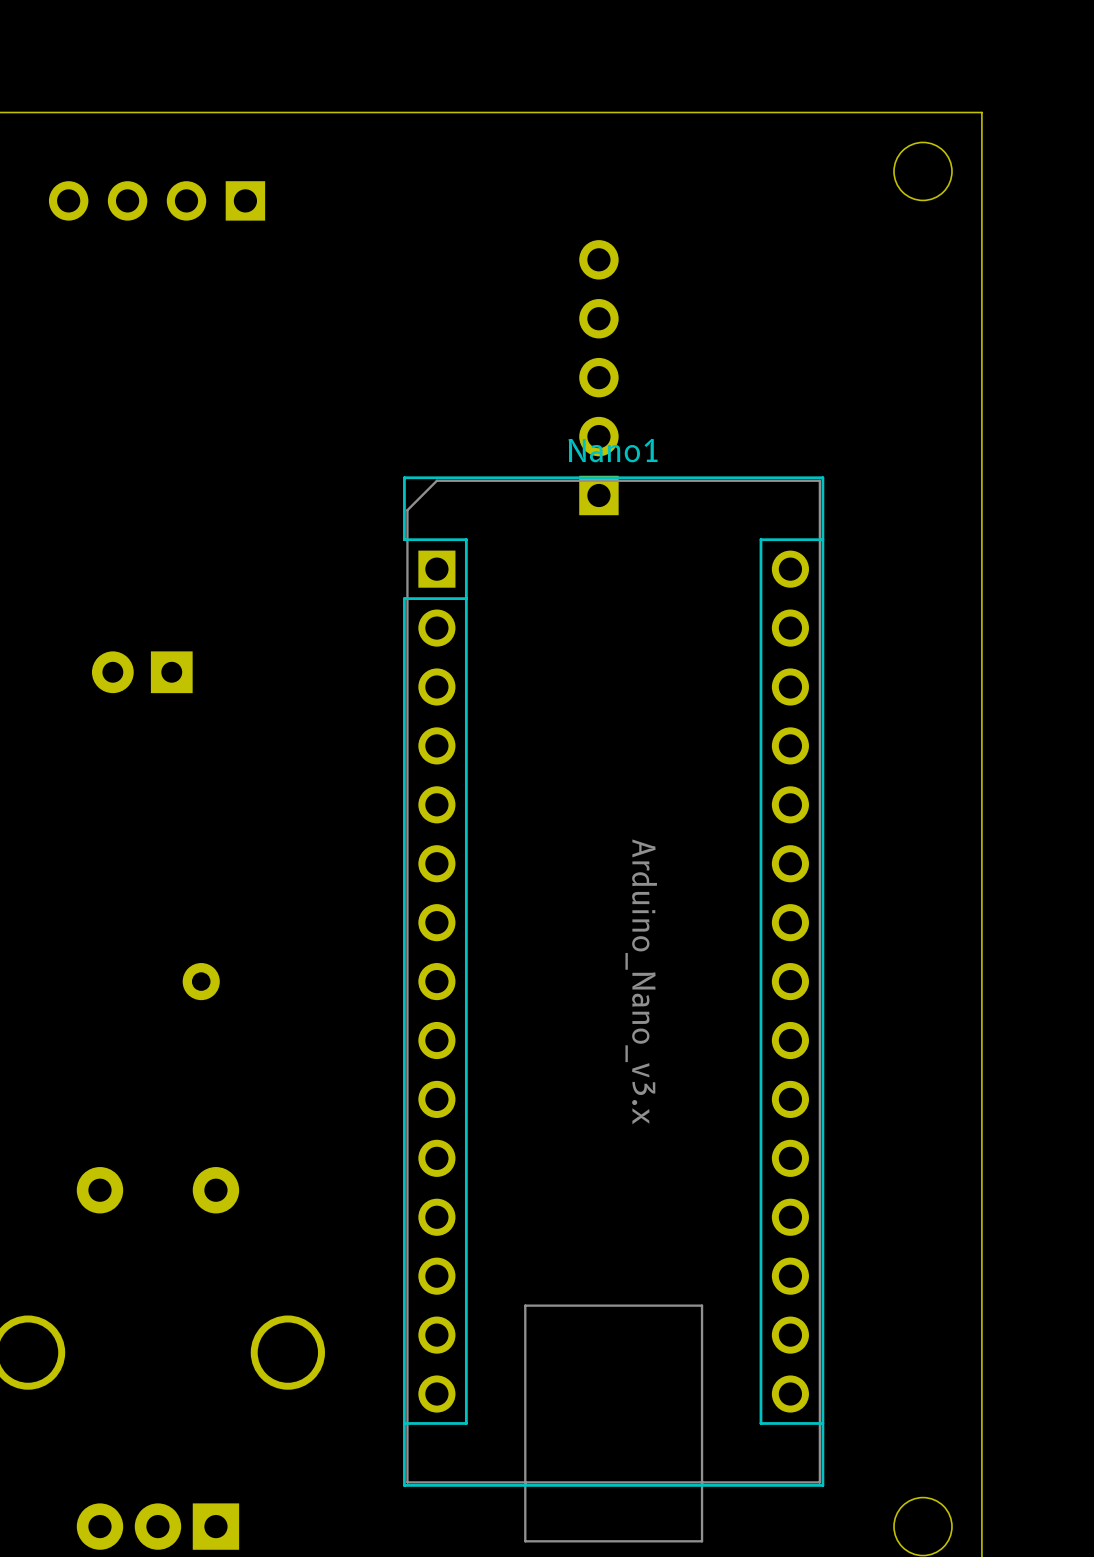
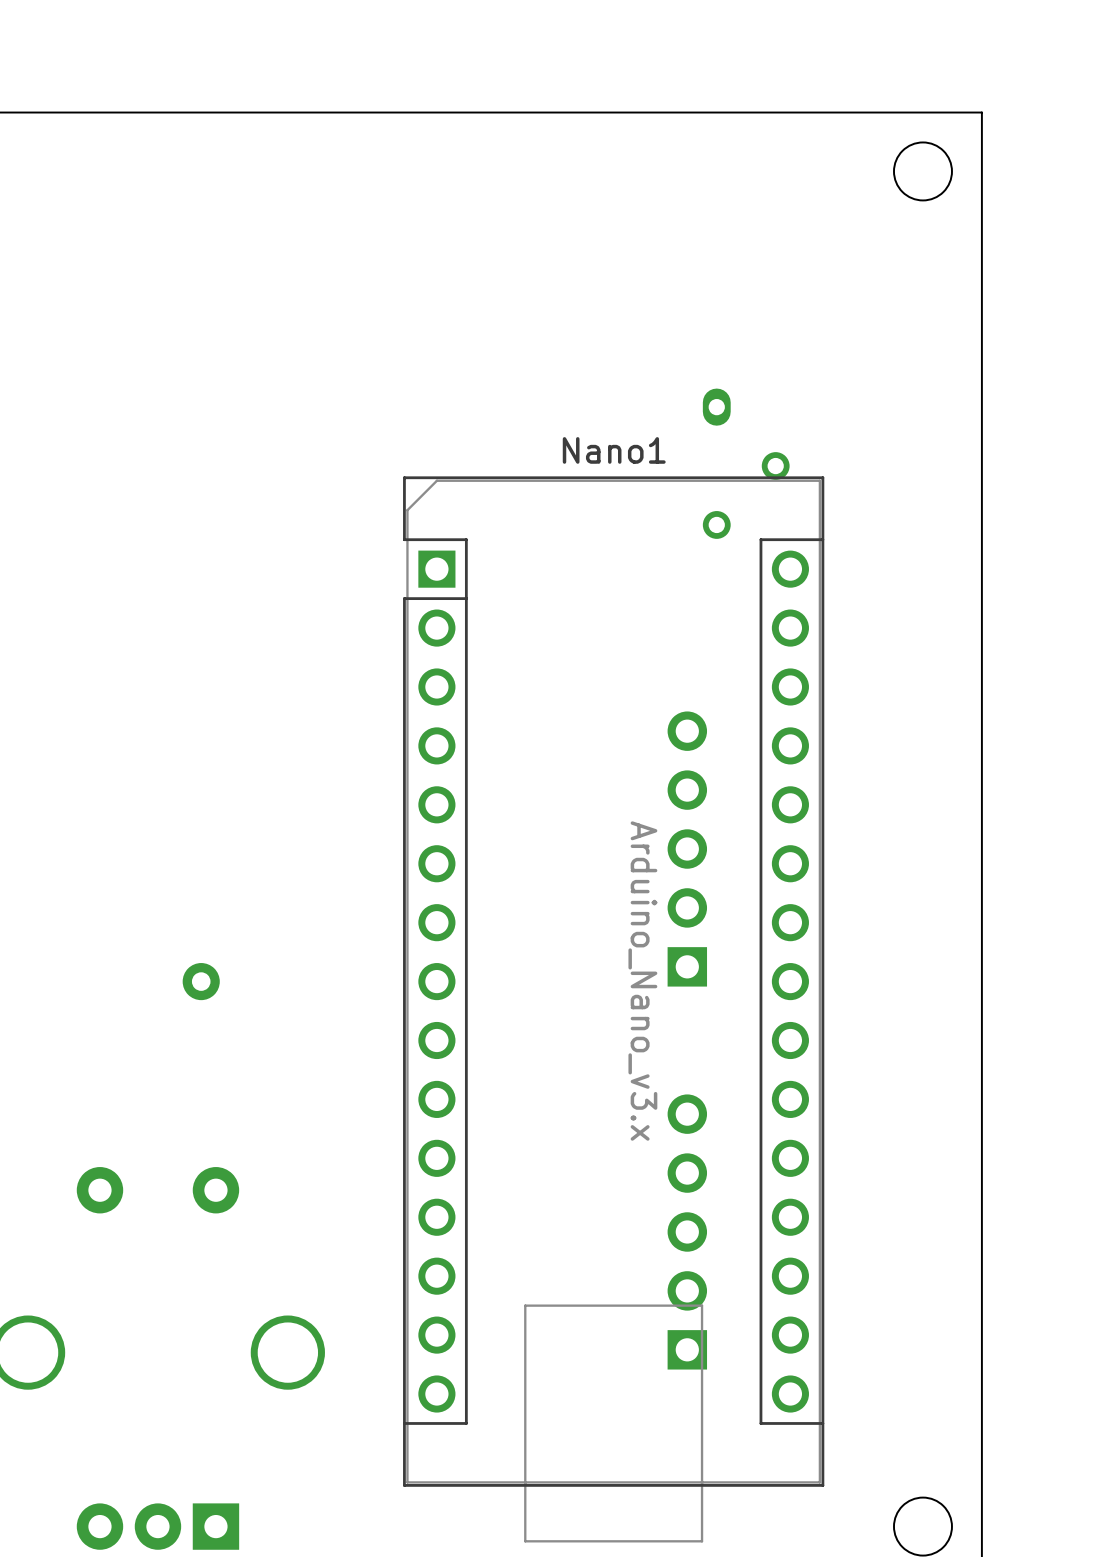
part: (157, 200) -> none
part: (598, 377) -> none
part: none -> (746, 463)
part: (142, 672) -> none
part: none -> (687, 849)
part: none -> (687, 1231)

